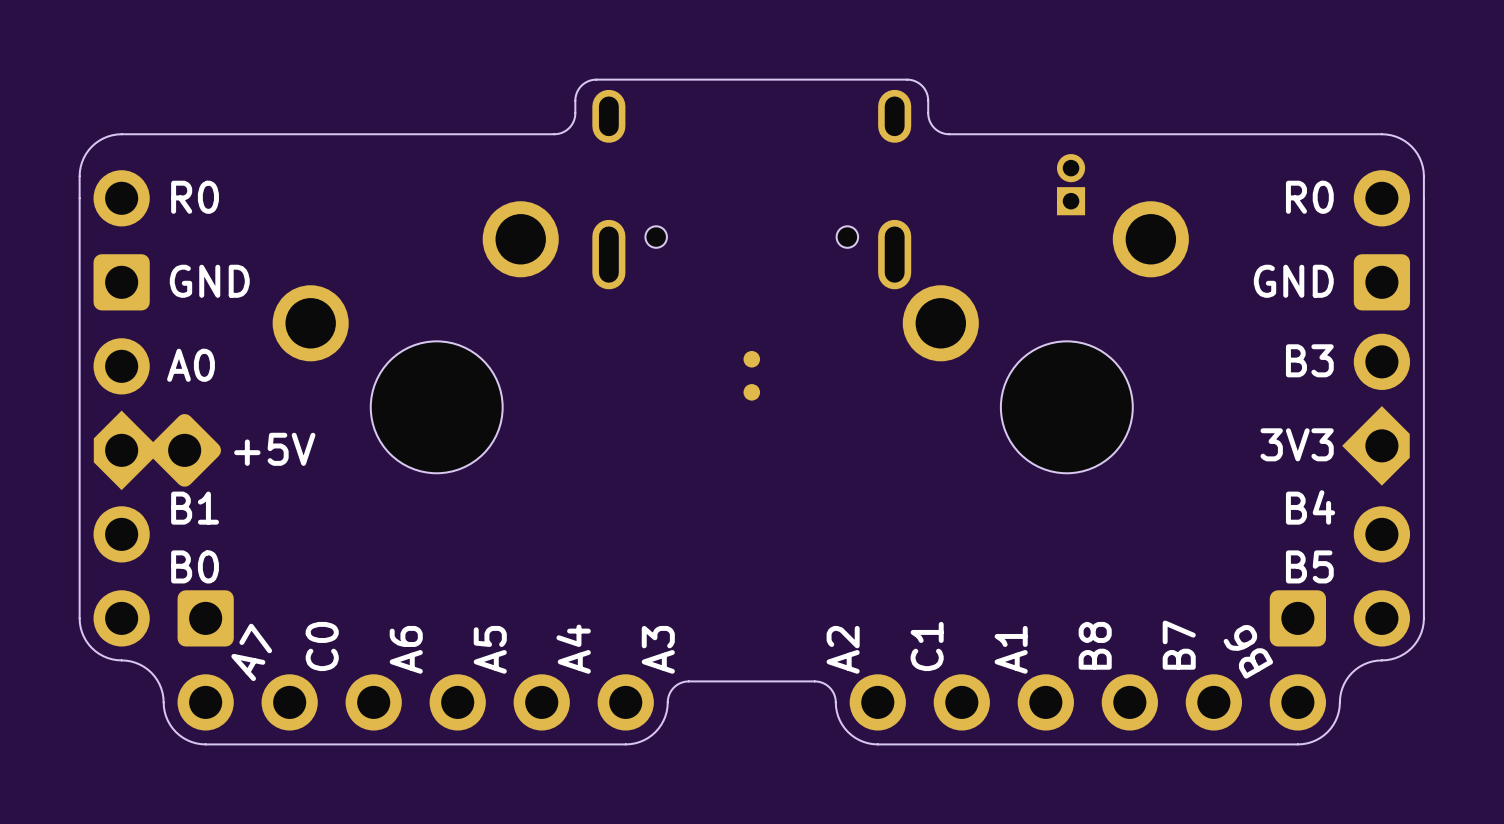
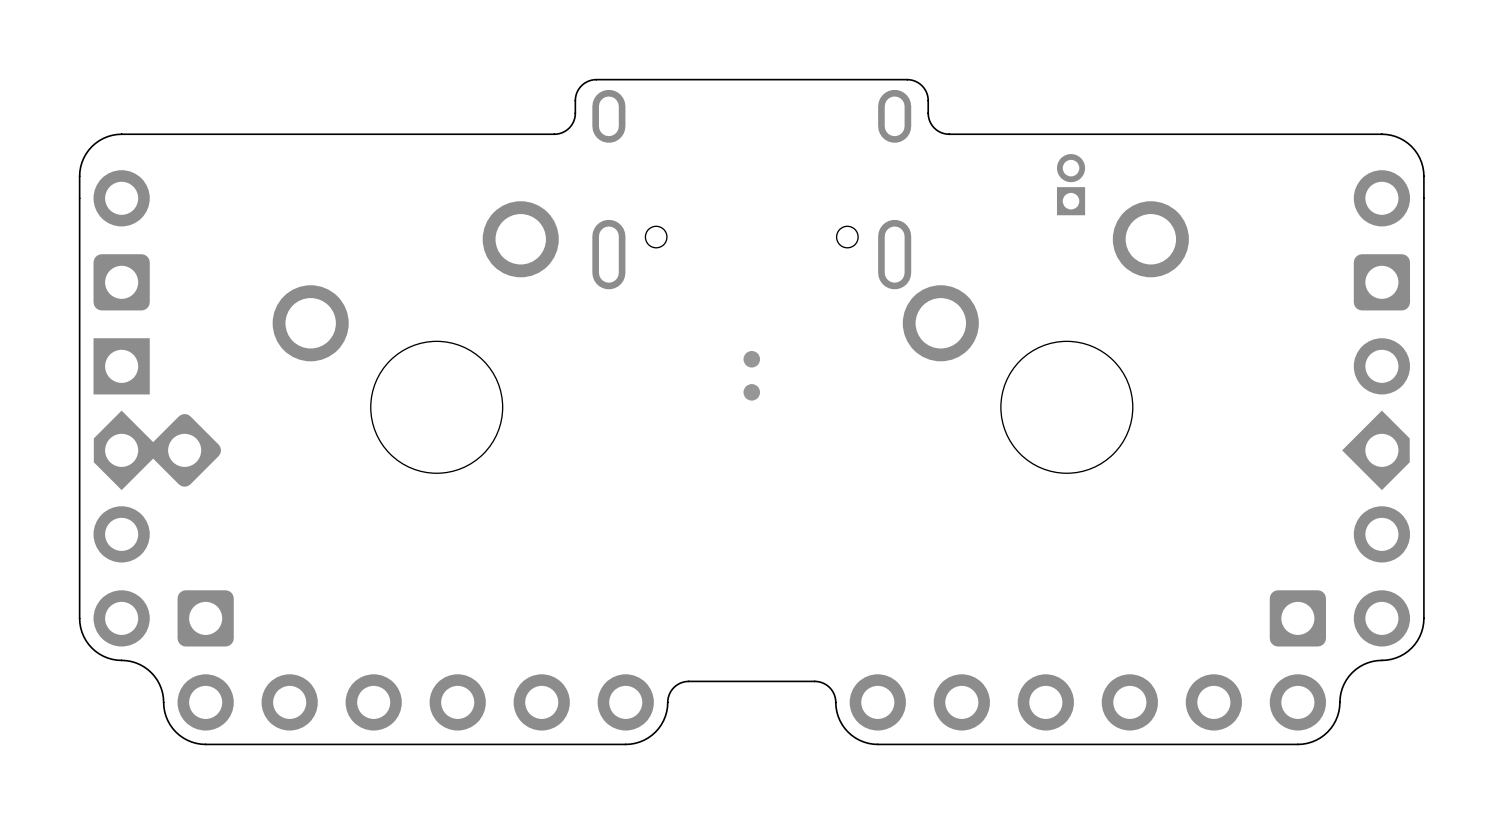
part footprint: [78, 170, 1425, 746] -> [78, 170, 1425, 746]

